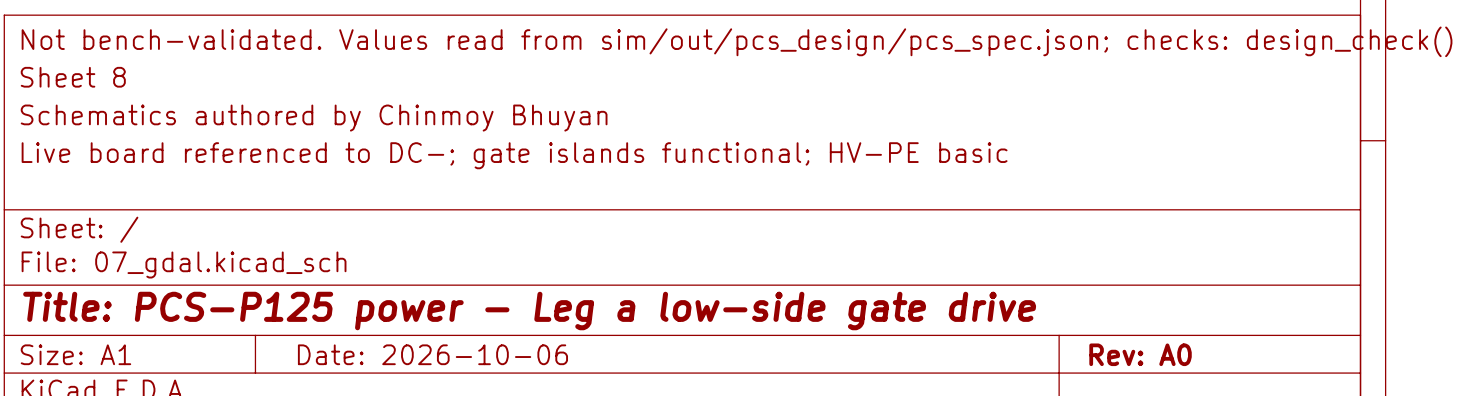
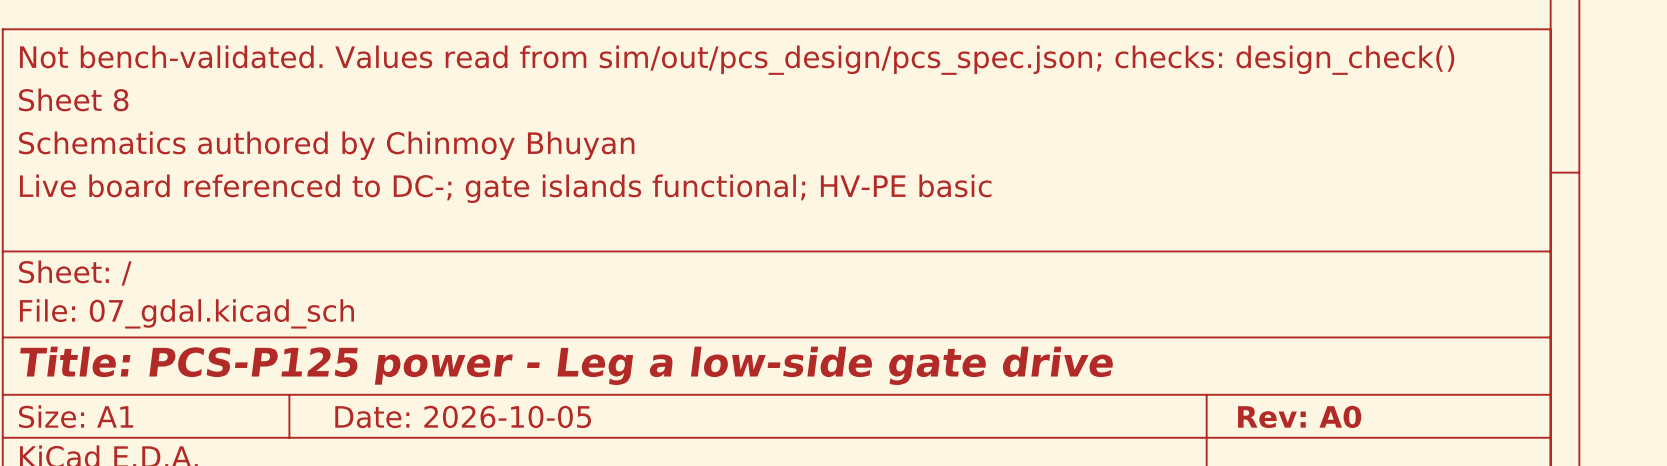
title block: Date: 2026-10-06 (432, 354) -> Date: 2026-10-05 (463, 416)

